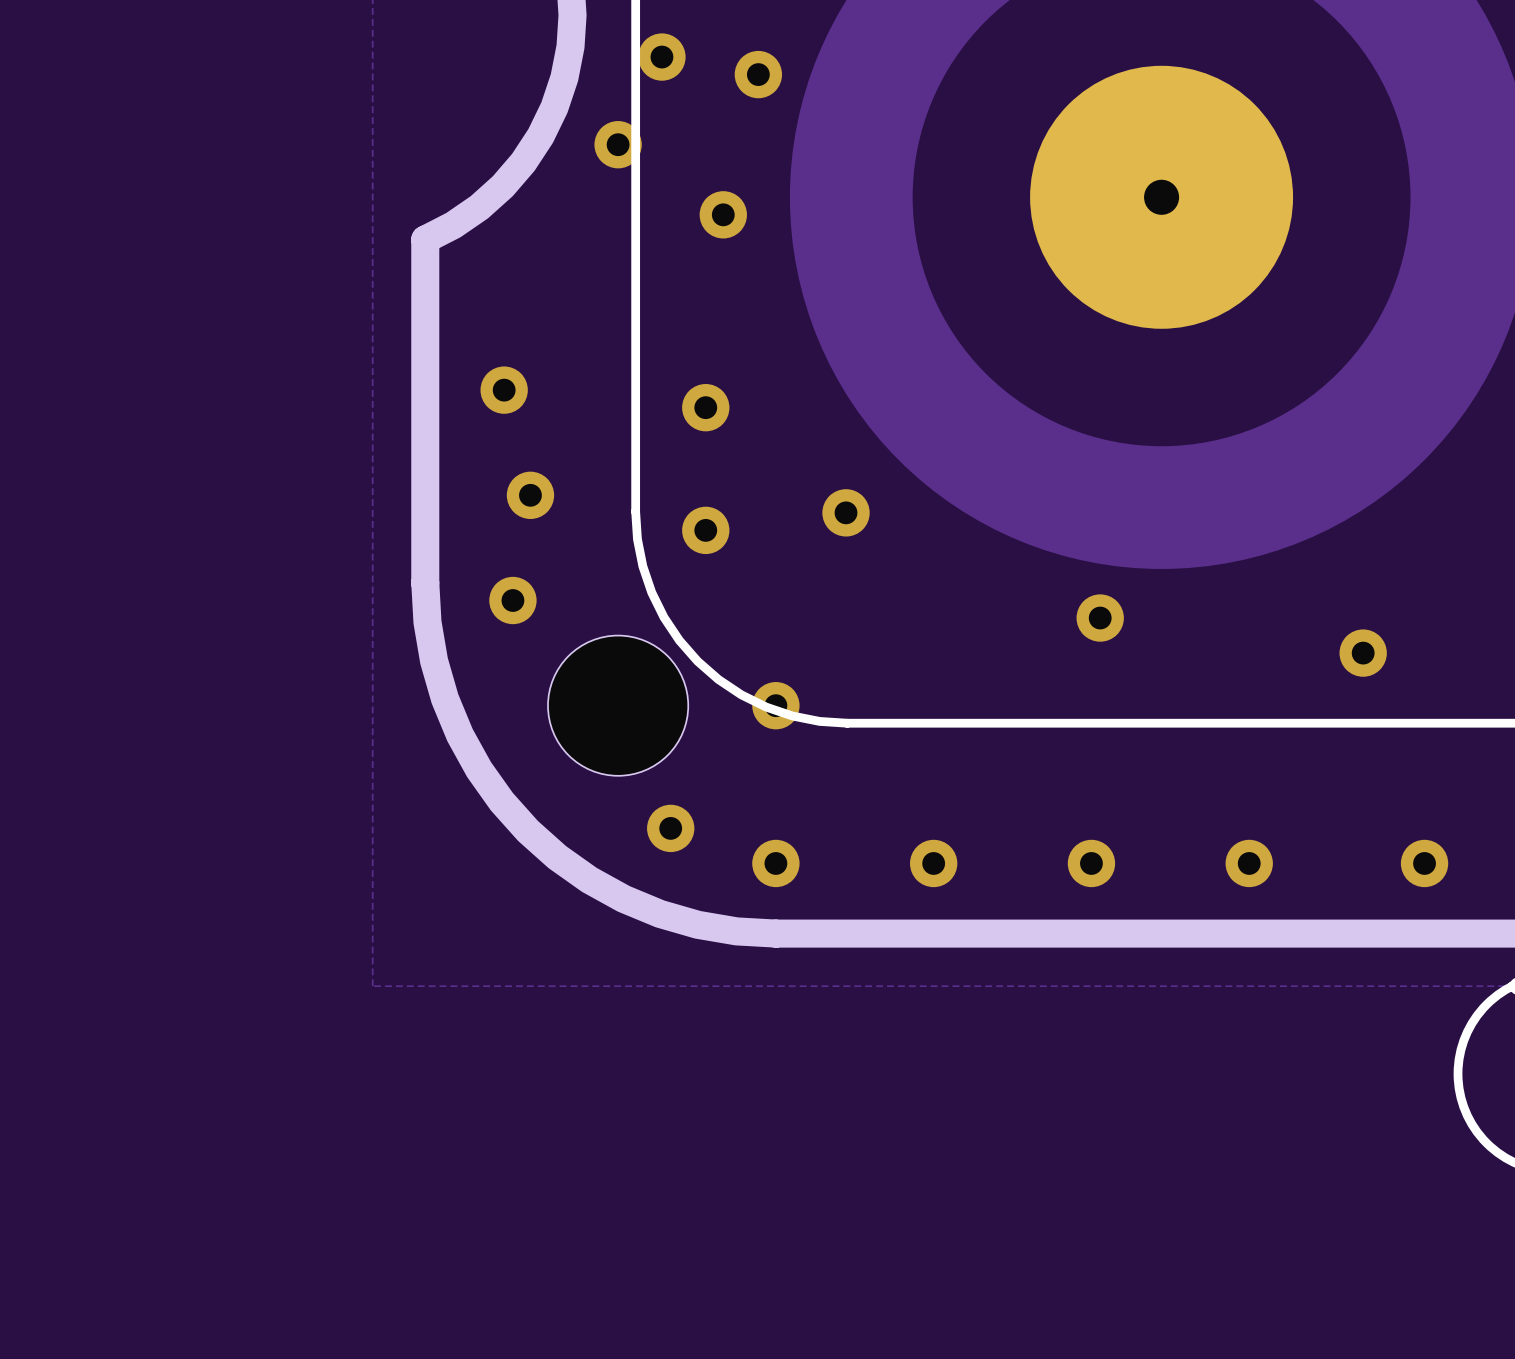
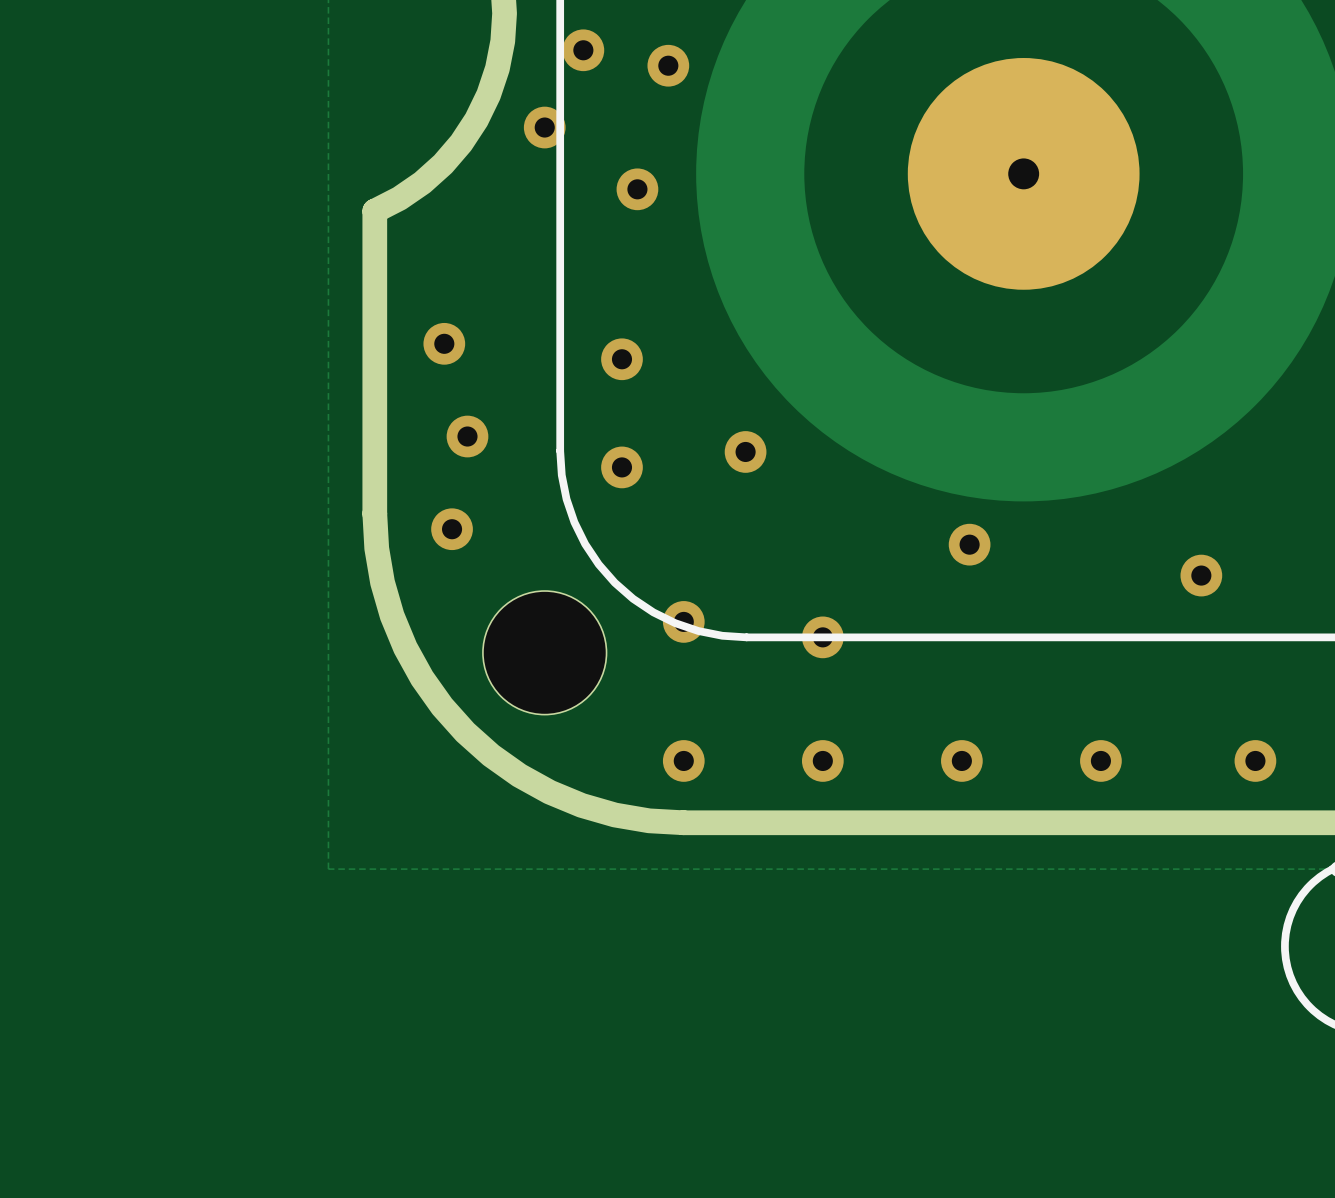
hole position: (618, 705) -> (544, 652)
via position: (670, 828) -> (822, 637)

